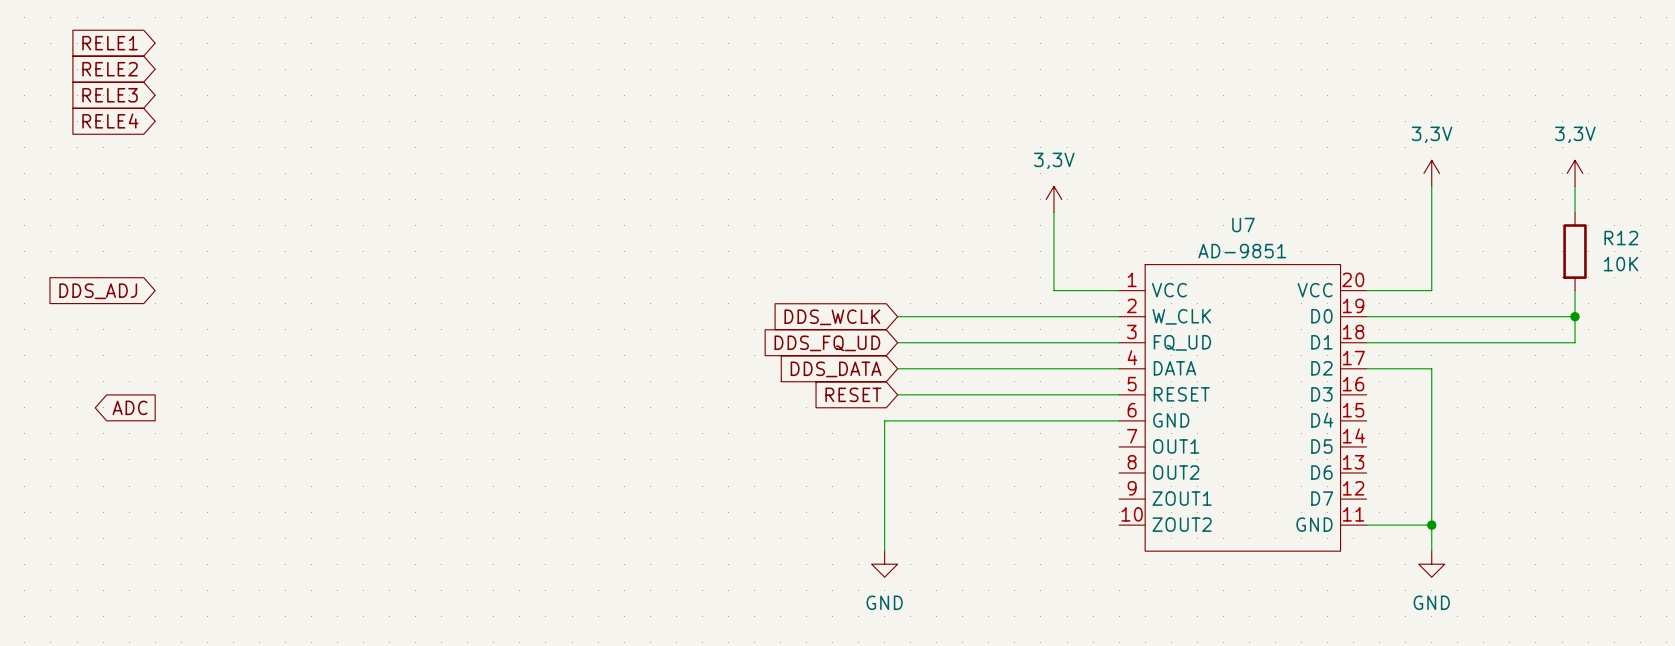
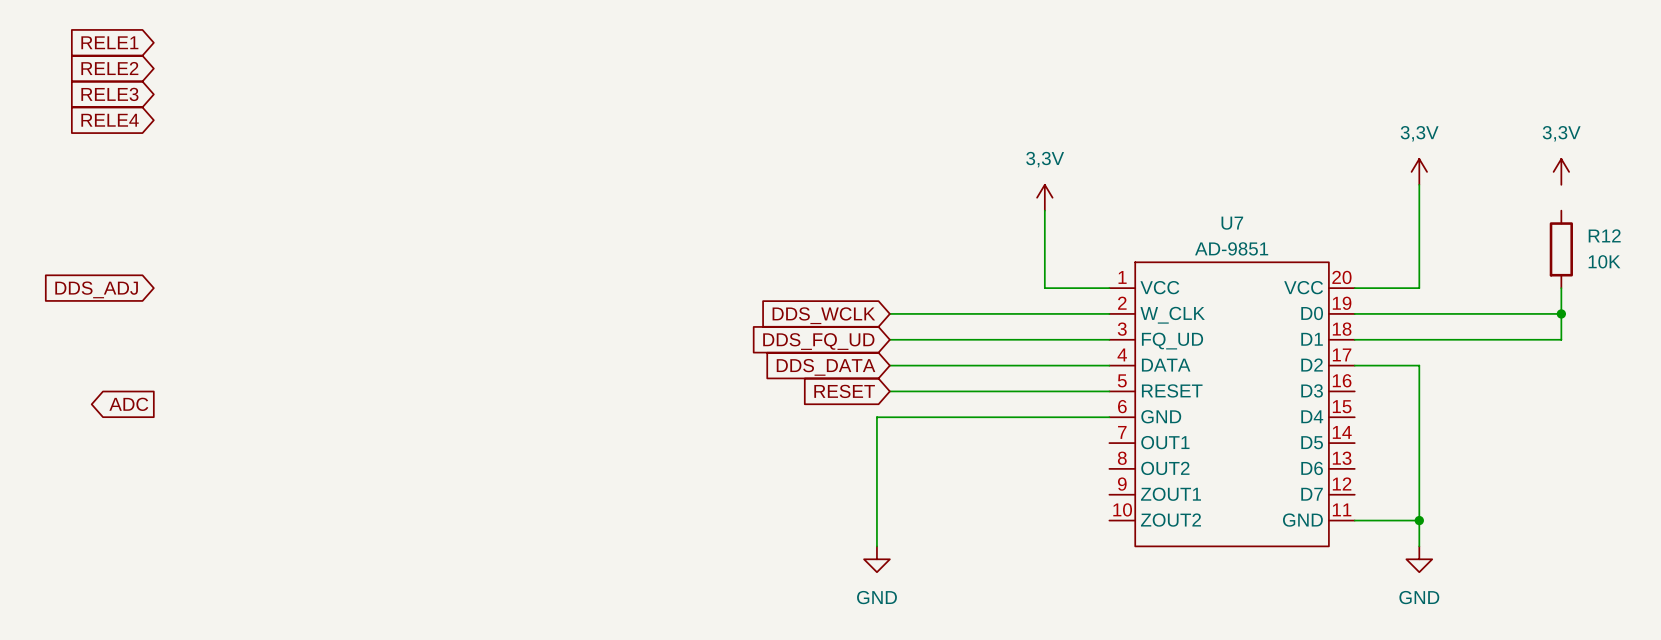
wire: (1575, 186) (1575, 212) -> none

